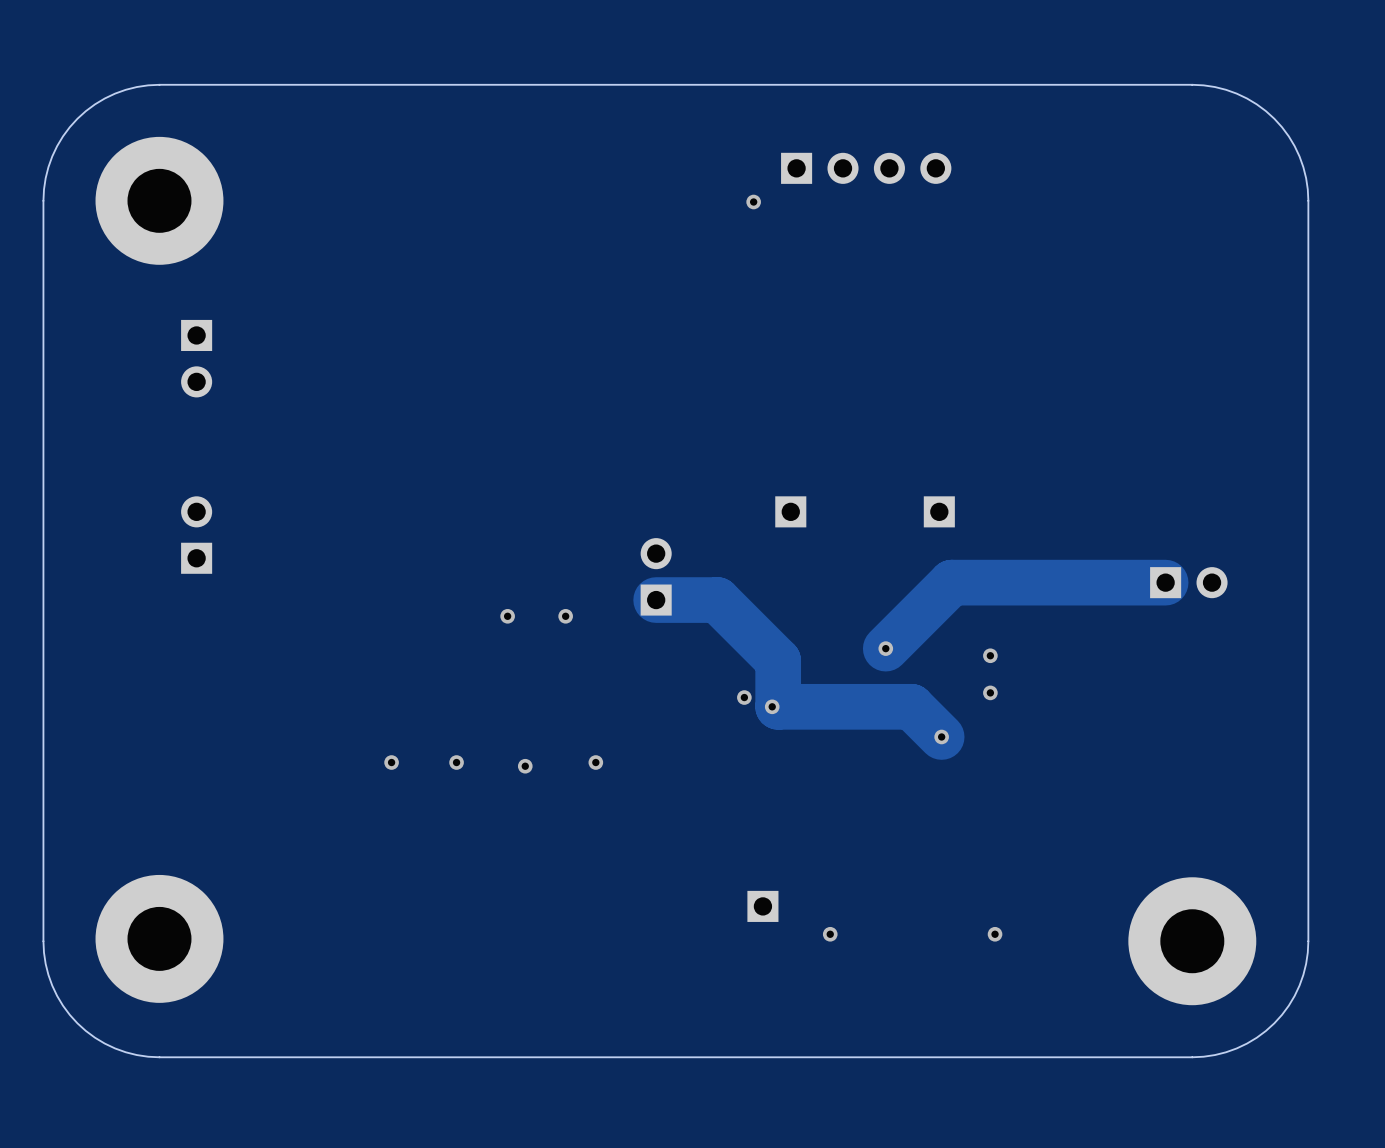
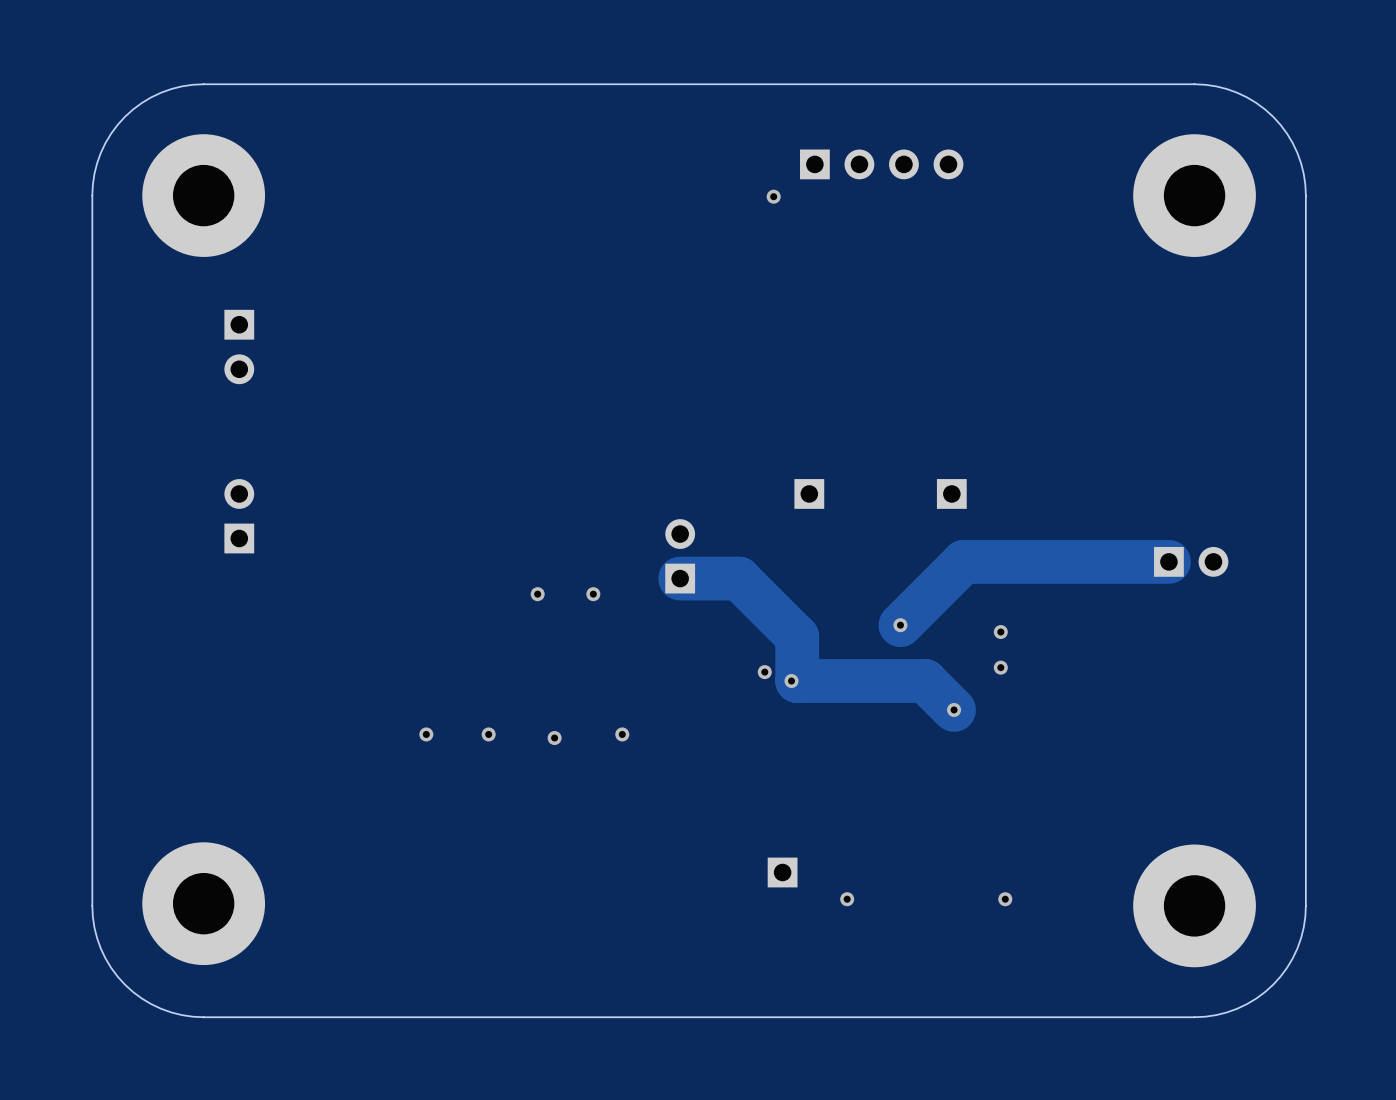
part: none -> (1194, 195)

